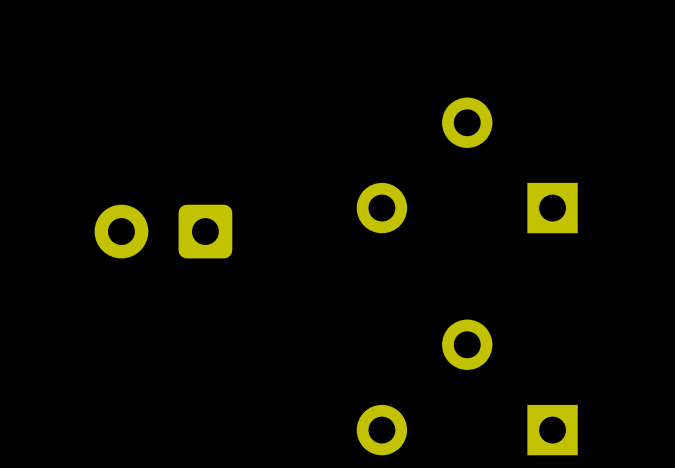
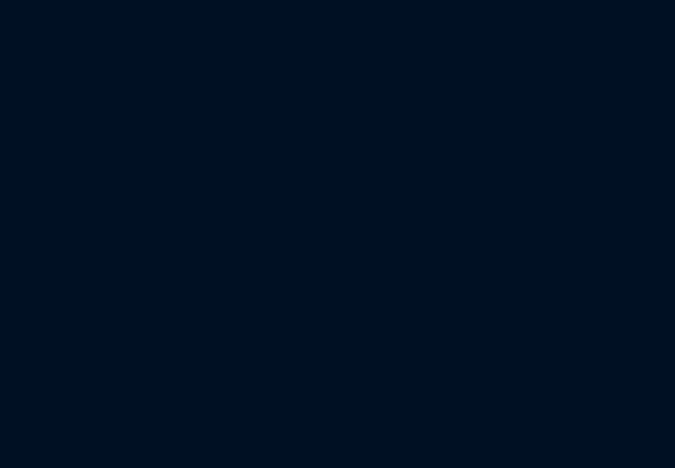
part: (467, 165) -> none
part: (163, 231) -> none
part: (467, 387) -> none

